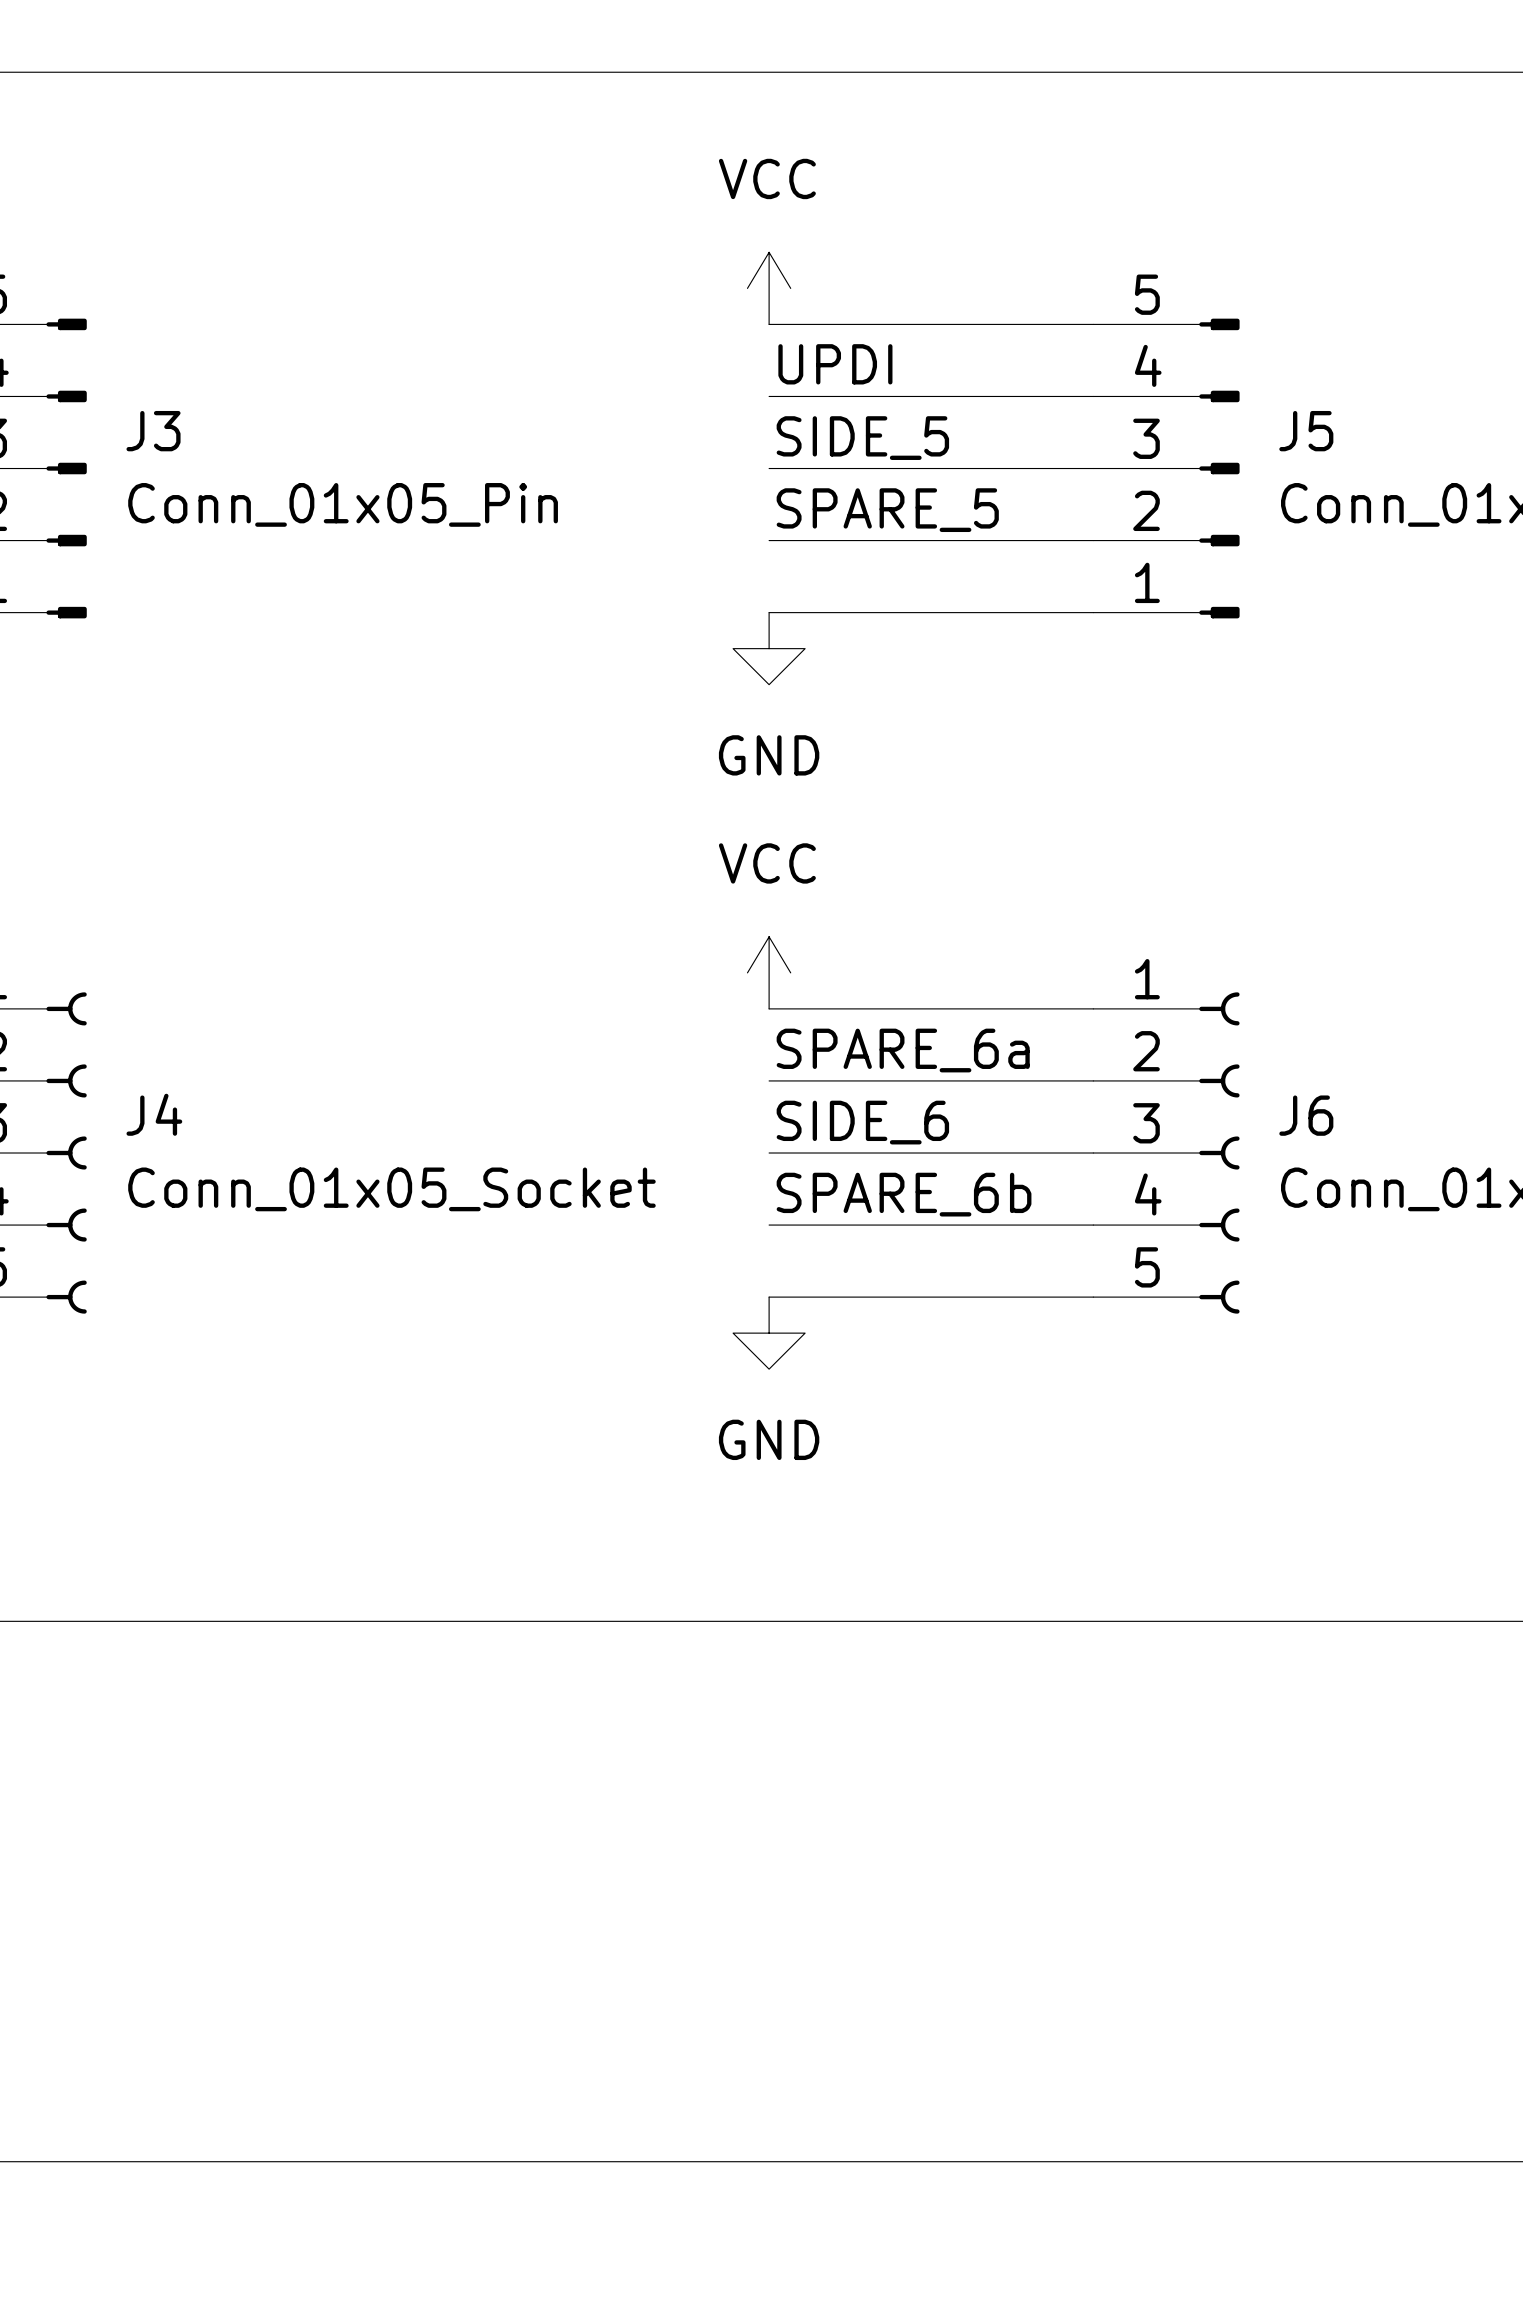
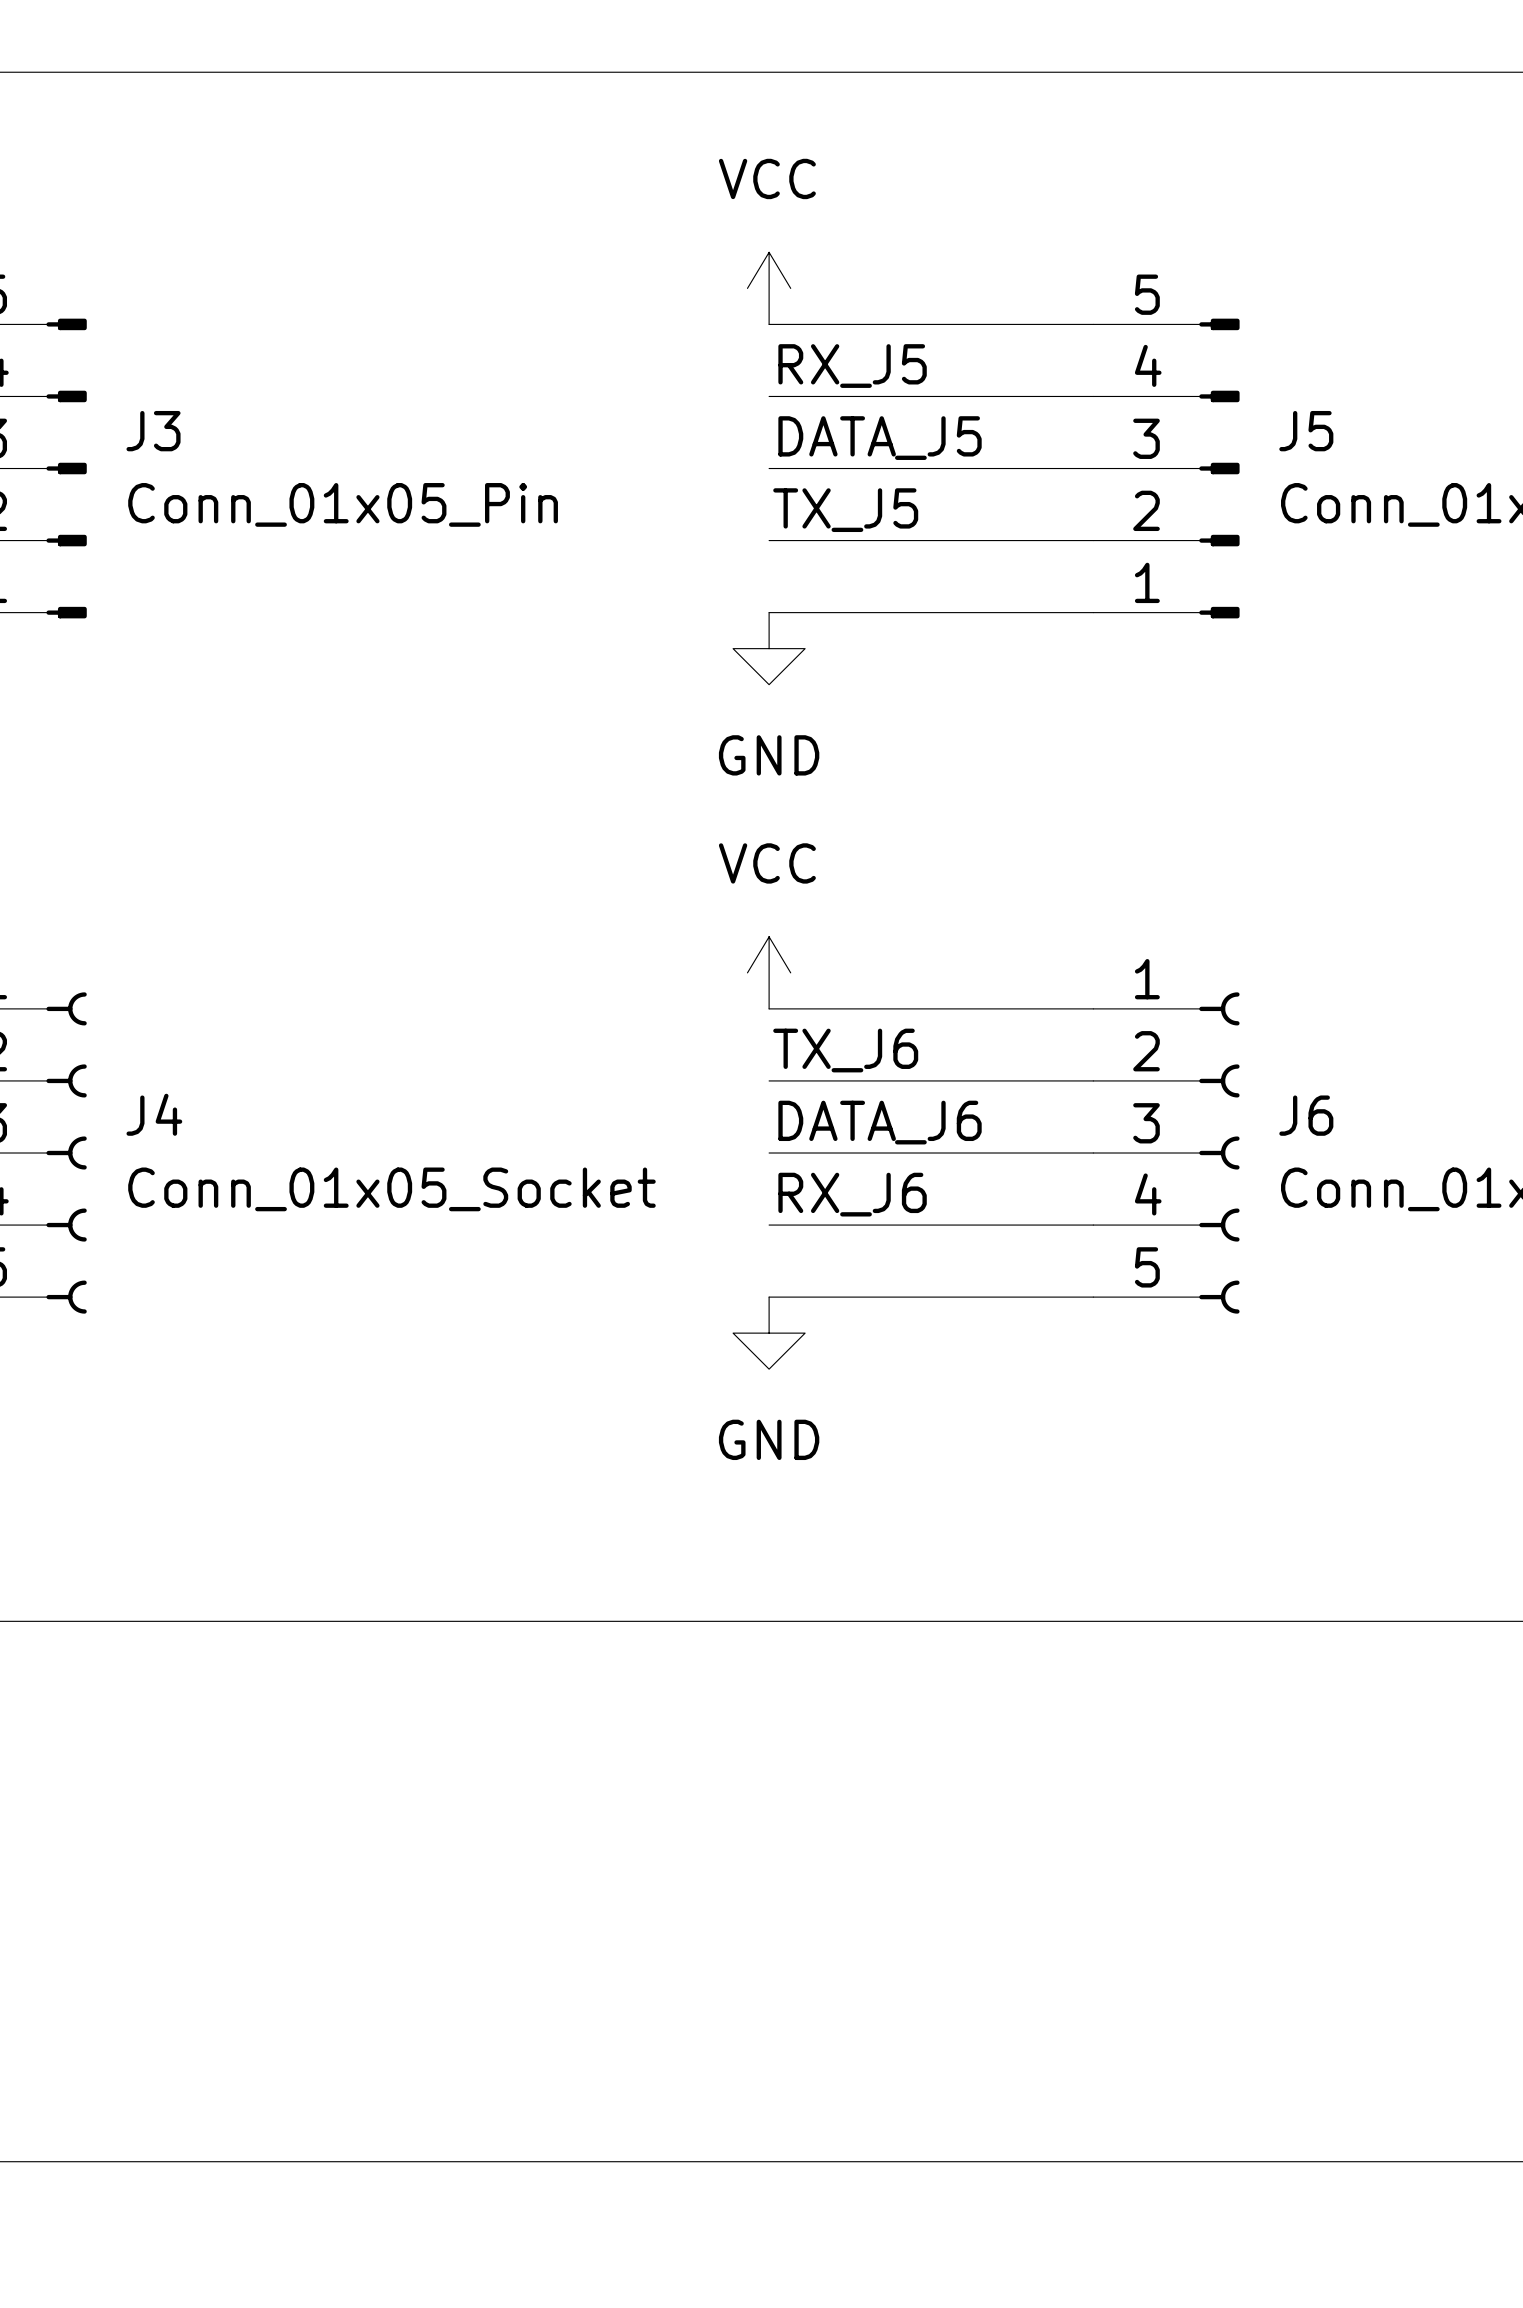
label: UPDI (835, 364) -> RX_J5 (852, 366)
label: SIDE_5 (862, 438) -> DATA_J5 (880, 438)
label: SPARE_5 (887, 510) -> TX_J5 (845, 510)
label: SPARE_6a (903, 1050) -> TX_J6 (845, 1050)
label: SIDE_6 (862, 1122) -> DATA_J6 (880, 1122)
label: SPARE_6b (904, 1194) -> RX_J6 (852, 1194)

